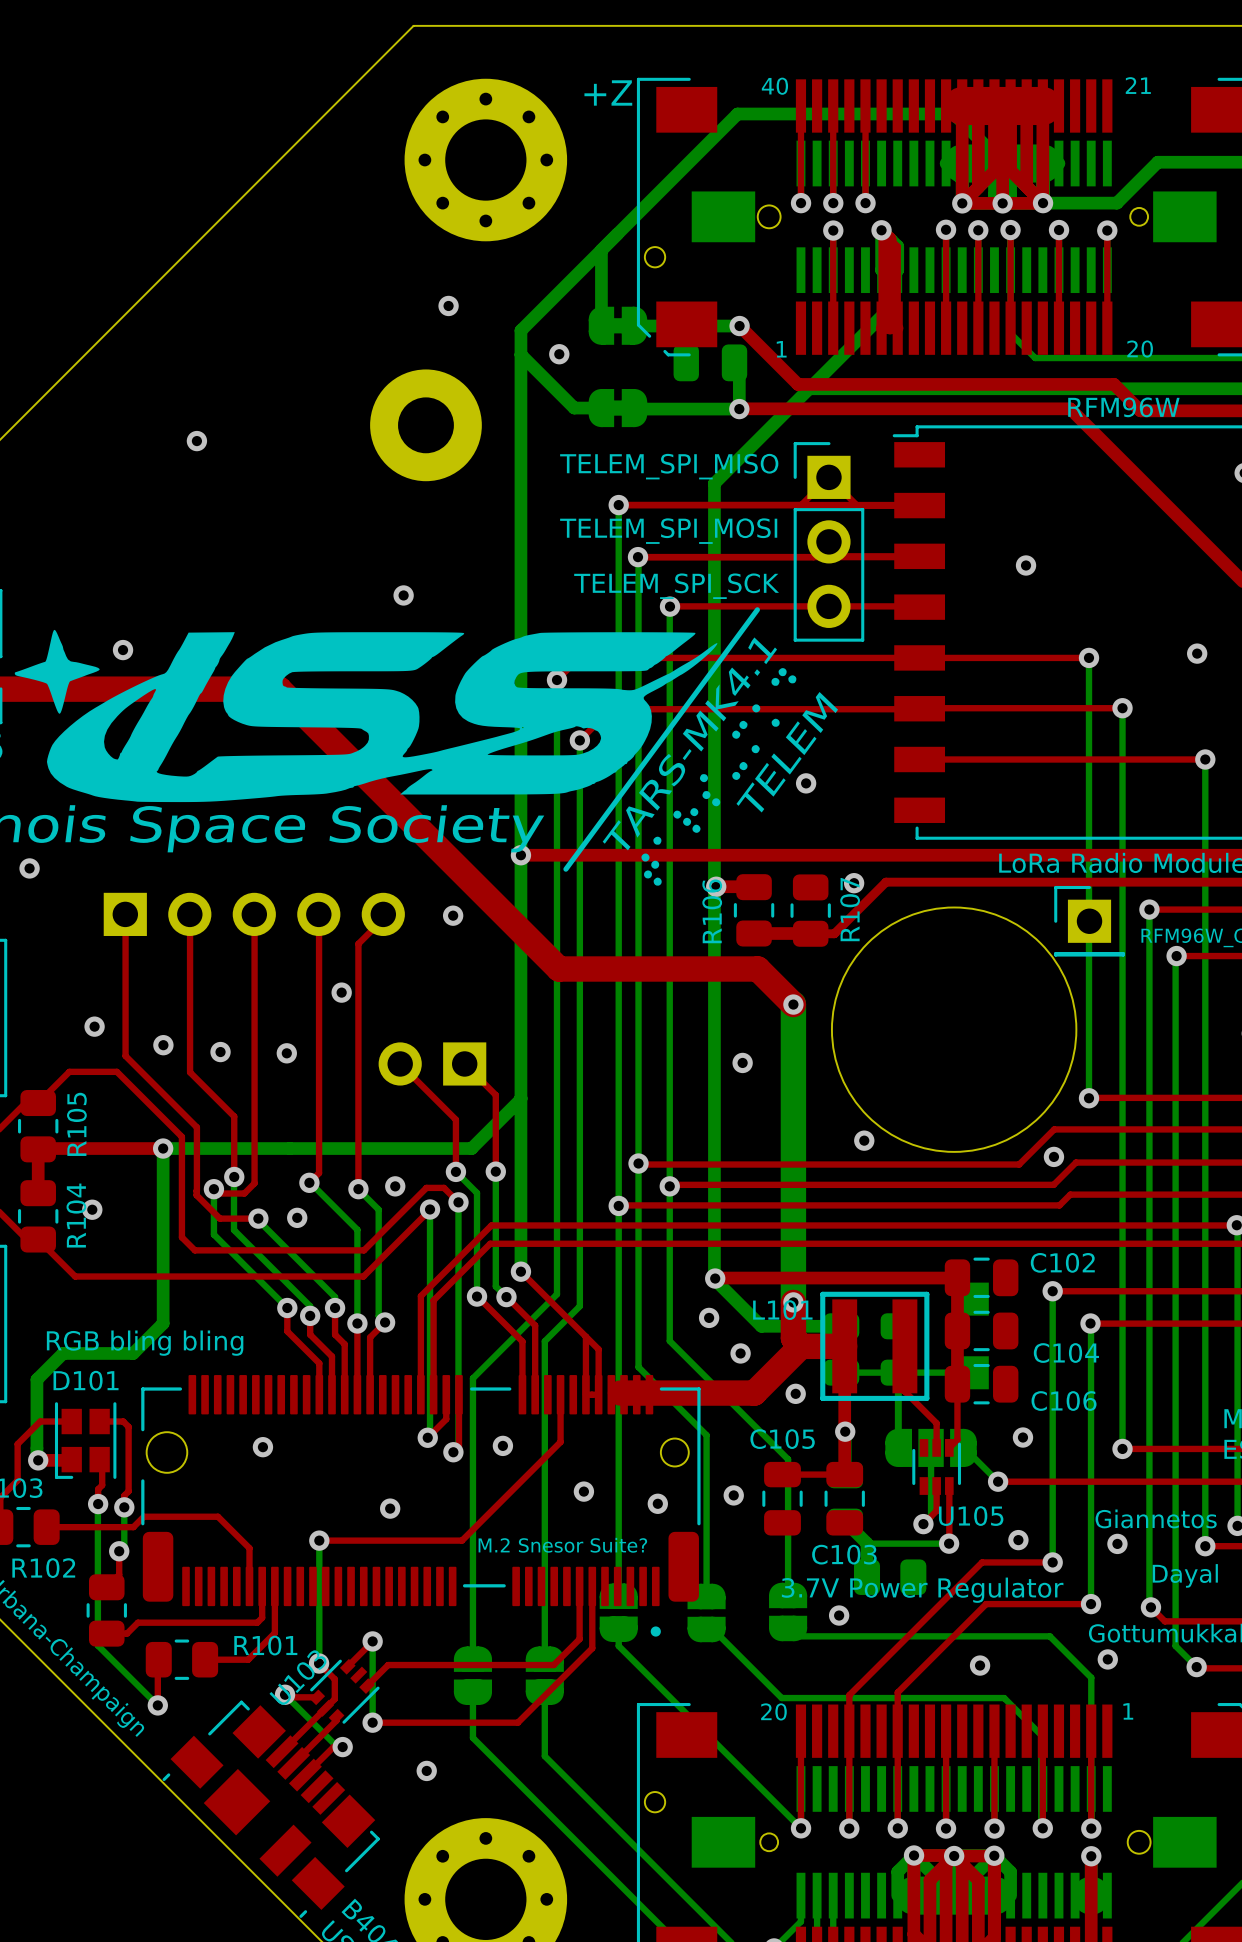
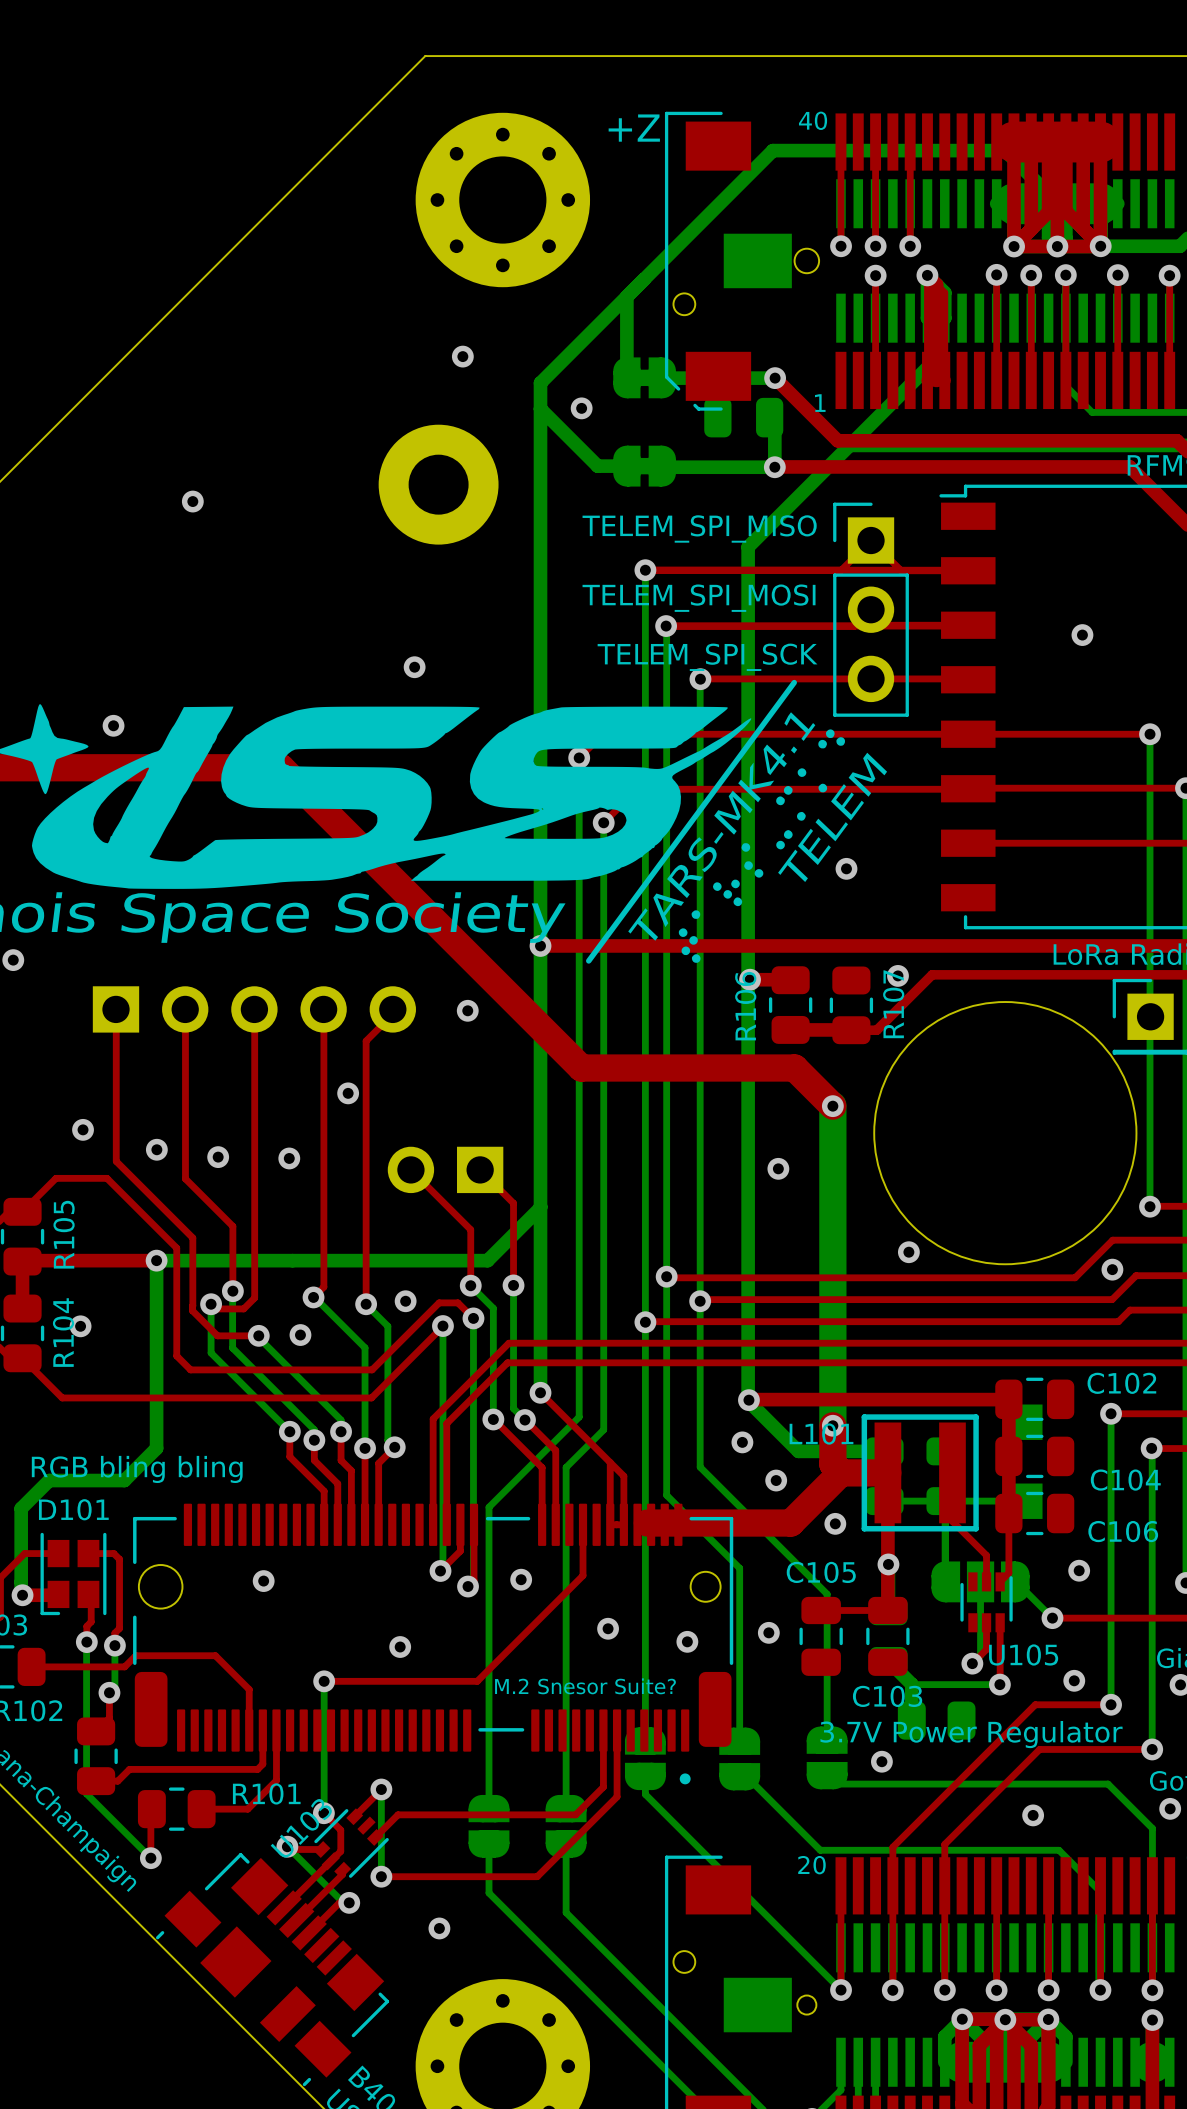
text position: TELEM (787, 752) -> TELEM (832, 817)
drawing position: (718, 776) -> (761, 846)

